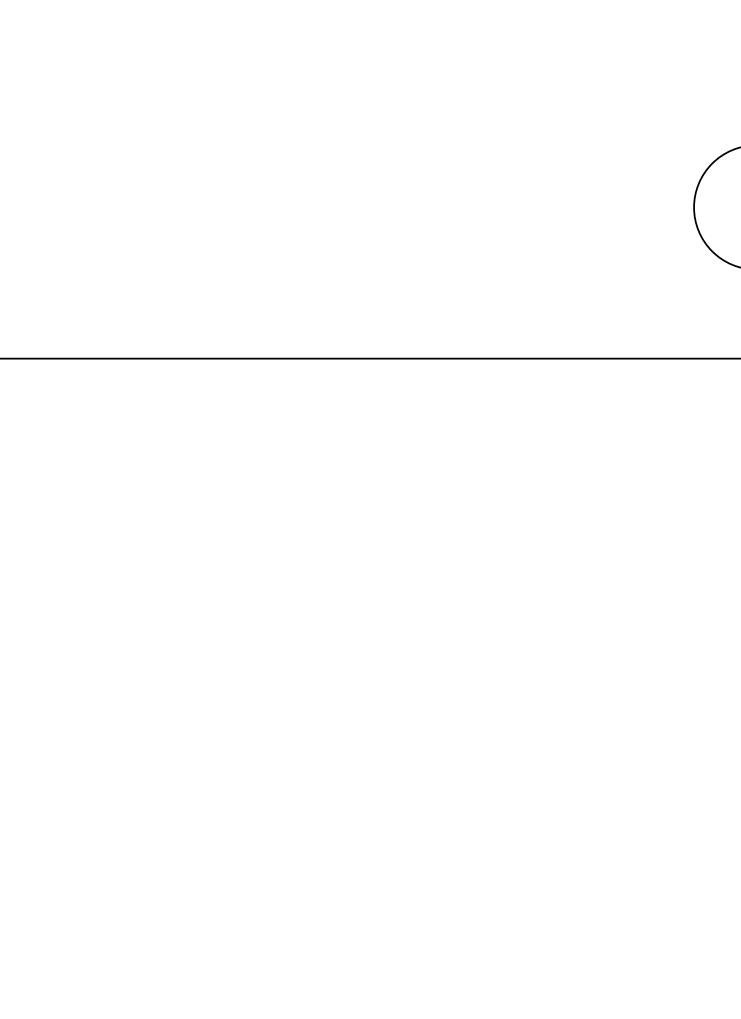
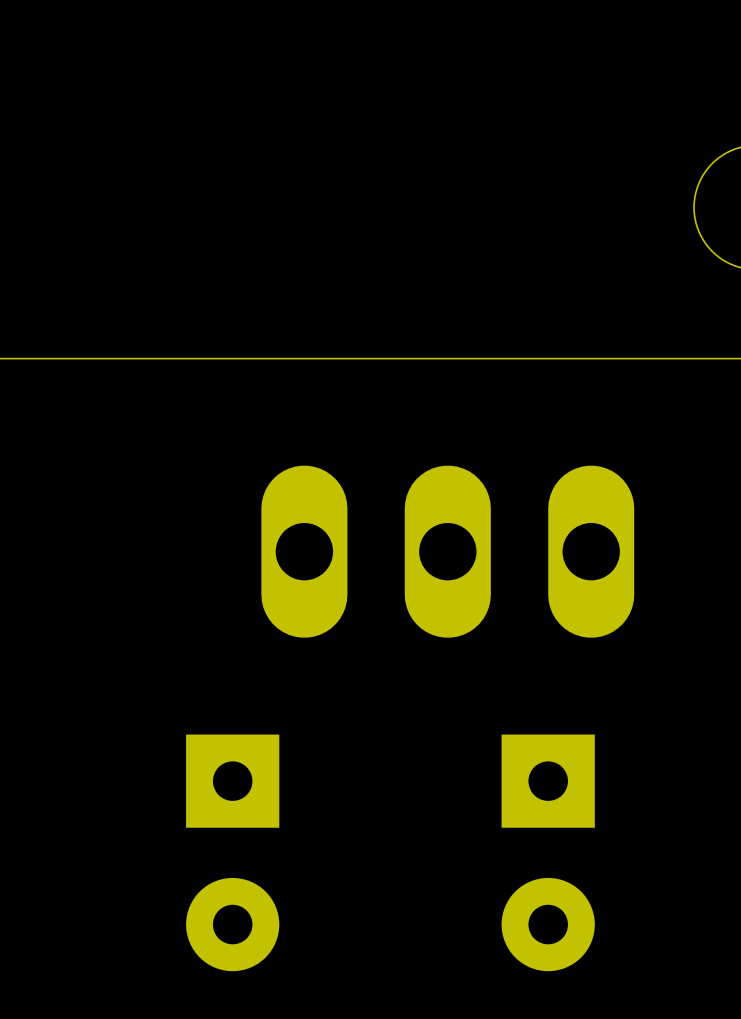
part: none -> (447, 551)
part: none -> (232, 852)
part: none -> (548, 852)

